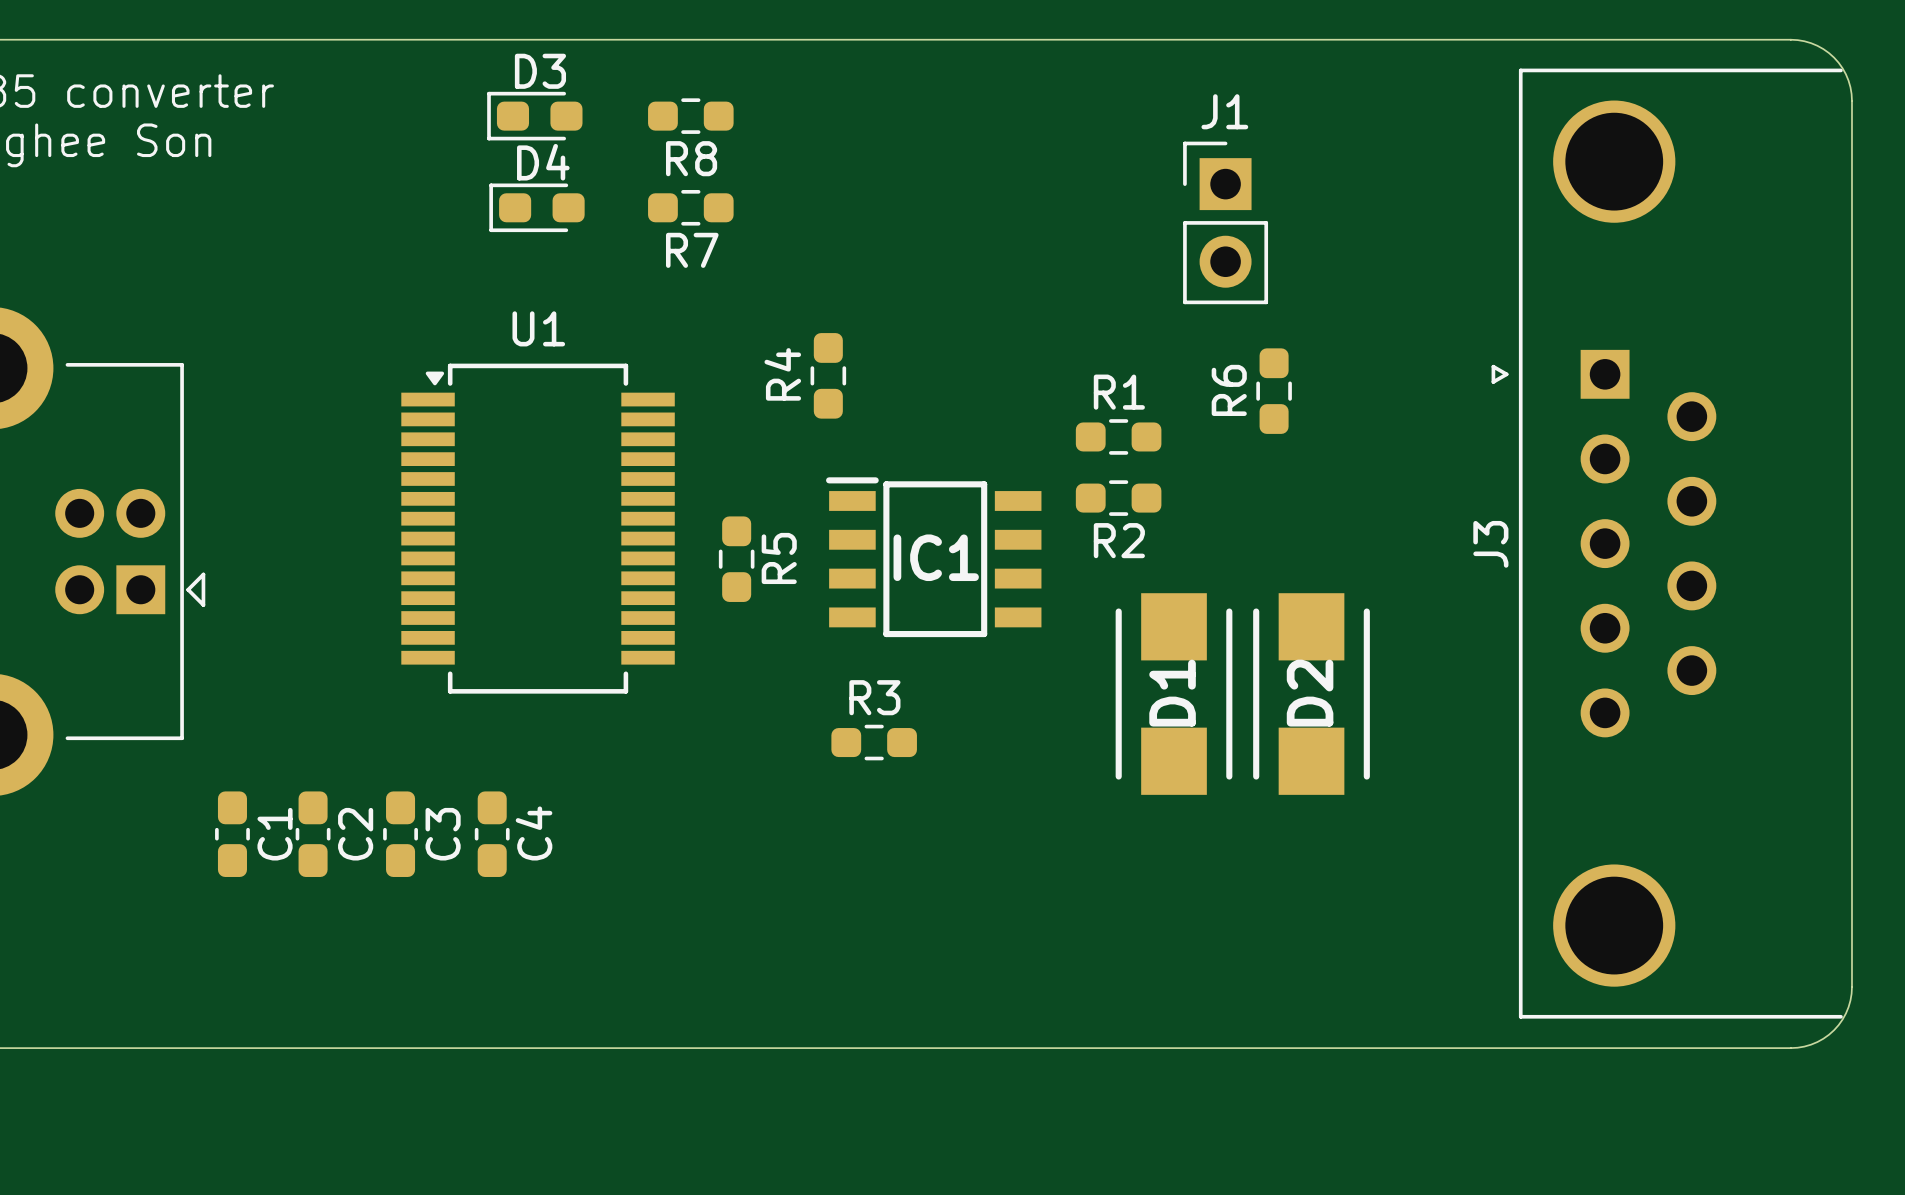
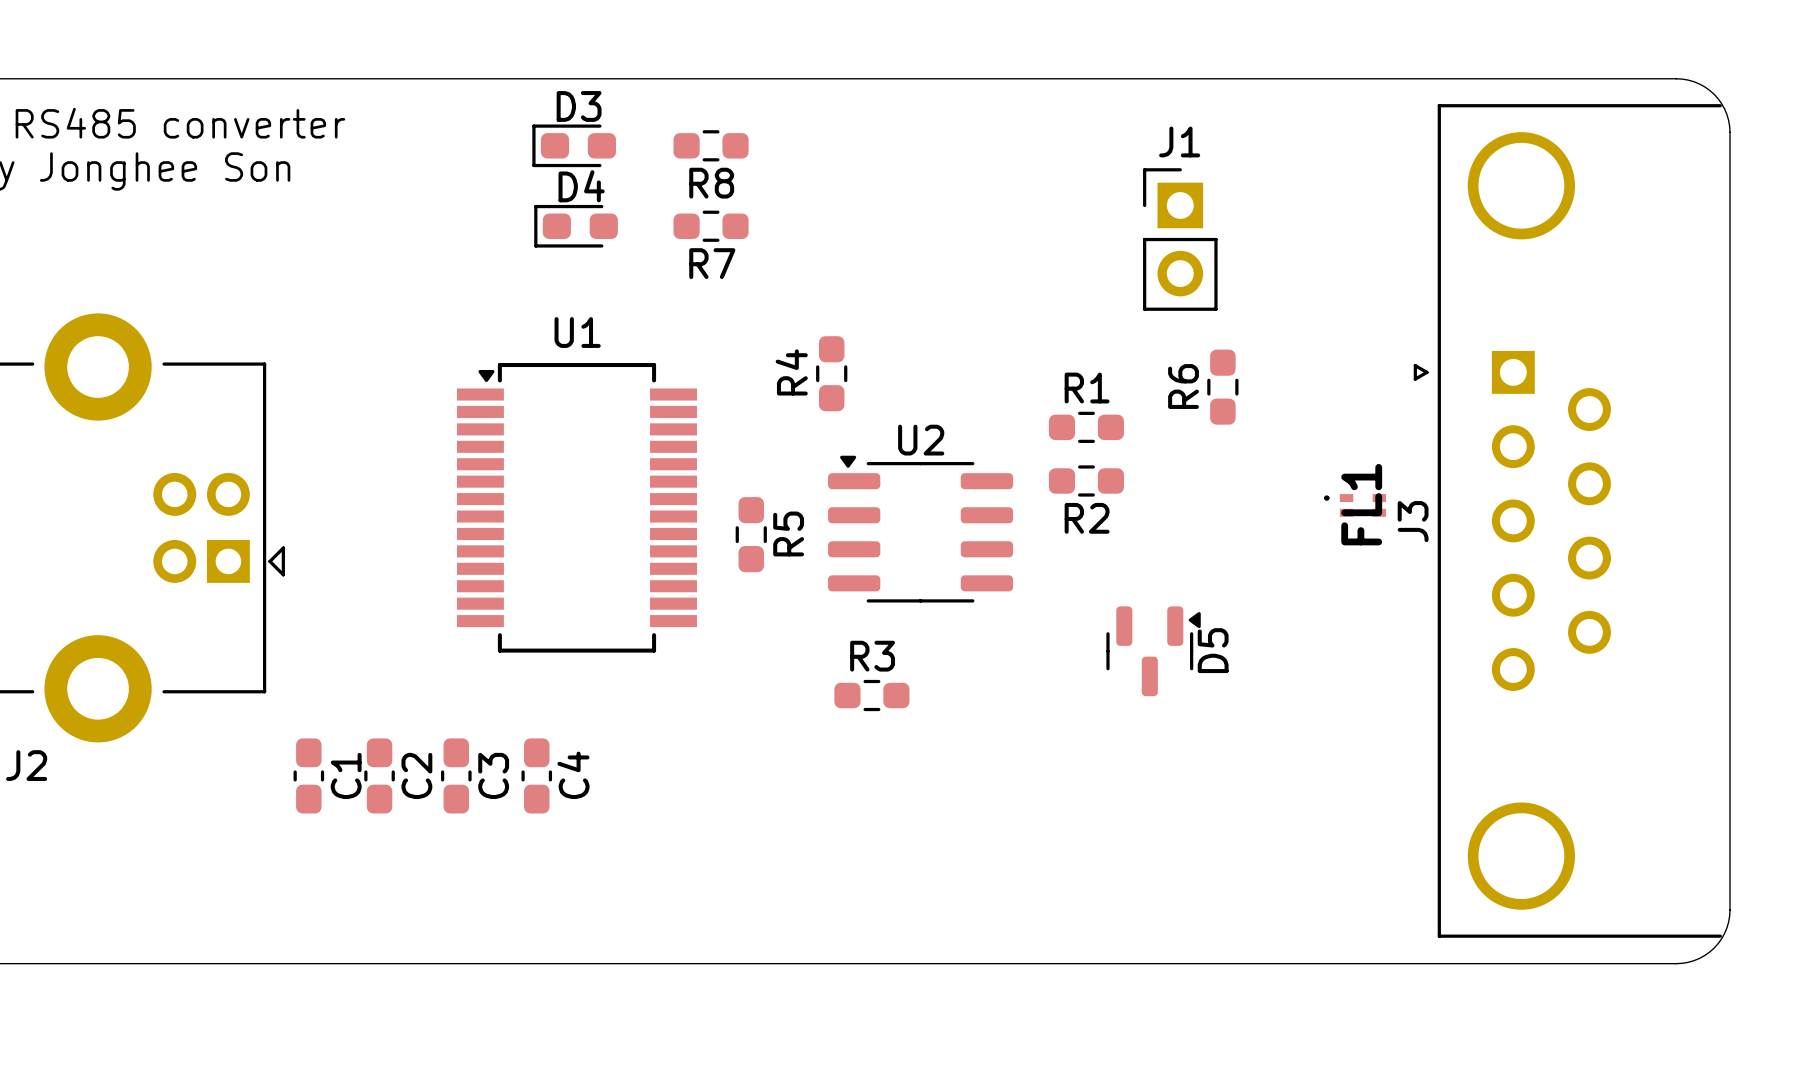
FL1: none -> (1355, 505)
U2: none -> (920, 529)
IC1: (933, 557) -> none
D5: none -> (1153, 651)
D1: (1174, 694) -> none
D2: (1311, 694) -> none

